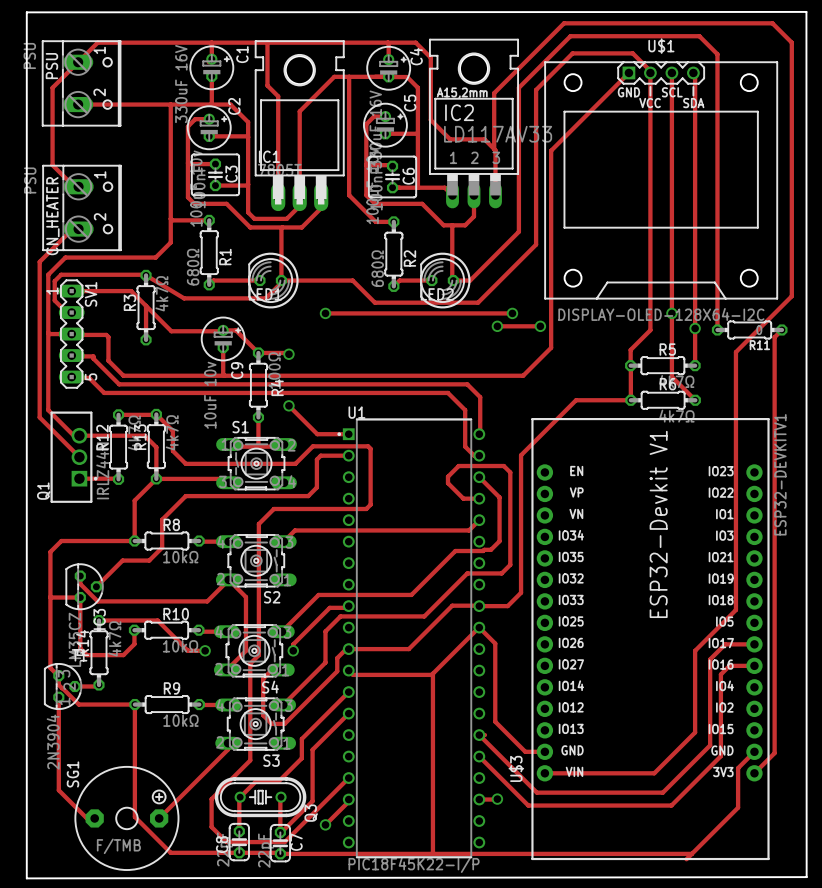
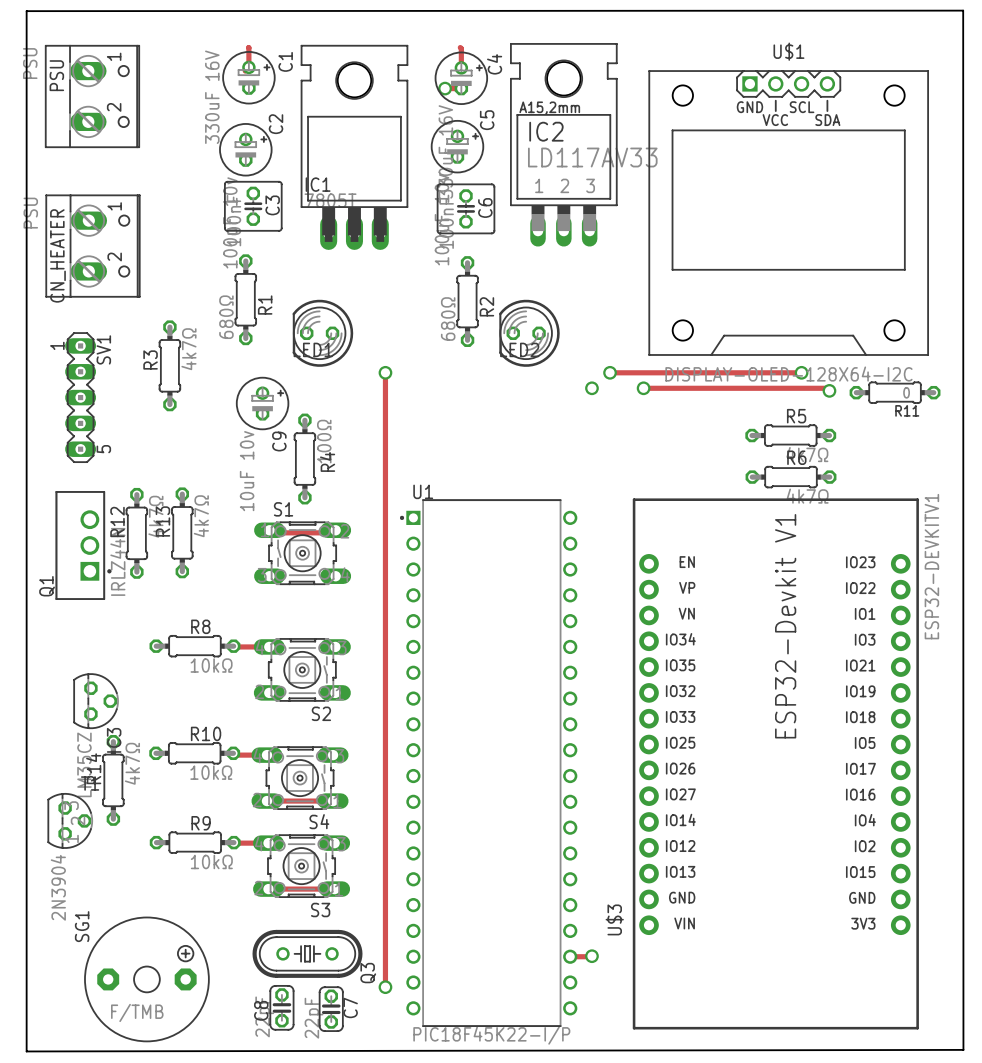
track: (267, 42) (267, 85) (278, 96) (278, 196) -> none
track: (628, 72) (551, 150) (551, 347) (523, 375) (123, 375) (108, 360) (108, 337) (106, 334) (48, 332) -> none
track: (671, 72) (671, 376) (695, 400) -> none
track: (693, 72) (695, 74) (695, 365) -> none
track: (211, 76) (211, 104) -> none
track: (349, 76) (349, 195) (375, 221) (393, 221) -> none
track: (375, 76) (334, 76) (299, 111) (299, 205) (286, 218) (254, 218) (248, 212) (248, 122) (230, 104) (78, 104) -> none
via: none -> (445, 88)
track: (388, 76) (407, 77) (417, 87) (417, 187) -> none
track: (170, 104) (170, 242) (155, 257) (65, 257) (48, 274) (48, 410) (73, 435) (144, 435) (156, 447) (156, 478) -> none
track: (385, 116) (374, 116) (366, 124) (366, 195) (374, 203) (422, 203) (443, 225) (465, 225) (473, 216) (473, 195) -> none
track: (209, 119) (195, 119) (187, 126) (187, 197) (194, 203) (226, 203) (250, 227) (301, 227) (321, 208) (321, 196) -> none
track: (417, 132) (385, 133) -> none
track: (209, 136) (248, 137) -> none
track: (494, 149) (494, 93) (564, 23) (772, 23) (791, 42) (791, 296) (735, 352) (735, 609) (695, 650) (695, 732) (654, 773) (544, 773) -> none
track: (187, 163) (215, 164) -> none
track: (366, 165) (392, 166) -> none
track: (80, 184) (74, 186) (52, 165) (52, 87) (97, 42) (415, 42) (430, 57) (430, 120) (450, 139) (484, 139) (495, 150) (495, 195) -> none
track: (248, 184) (215, 185) -> none
track: (392, 187) (444, 187) (452, 195) -> none
track: (170, 218) (209, 220) -> none
track: (452, 225) (453, 280) (470, 280) (518, 231) (518, 87) (570, 36) (699, 36) (717, 54) (717, 329) -> none
track: (282, 227) (281, 280) -> none
track: (78, 229) (72, 229) (39, 261) (39, 417) (79, 457) -> none
track: (259, 280) (213, 280) (209, 284) -> none
track: (281, 280) (352, 280) (374, 302) (478, 302) (536, 244) (536, 89) (572, 53) (632, 53) (650, 71) (650, 330) (630, 349) (630, 400) (576, 400) (521, 455) (521, 592) (507, 606) (479, 606) -> none
track: (281, 280) (282, 281) (265, 298) (184, 298) (145, 274) (61, 274) (54, 281) (54, 300) (66, 312) (72, 313) -> none
track: (431, 280) (399, 280) (393, 286) -> none
track: (71, 291) (131, 291) (171, 331) (235, 330) (258, 352) (288, 354) -> none
track: (146, 305) (146, 339) -> none
track: (325, 313) (512, 313) -> (801, 372) (610, 372)
track: (497, 326) (540, 326) -> (826, 388) (643, 388)
track: (781, 329) (774, 337) (774, 753) (754, 773) -> none
track: (223, 347) (224, 375) -> none
via: (288, 354) -> none
track: (71, 355) (93, 356) (119, 384) (467, 384) (480, 397) (479, 434) -> none
track: (71, 377) (89, 377) (104, 392) (447, 392) (465, 410) (465, 446) (474, 455) (479, 455) -> none
track: (288, 405) (317, 434) (348, 434) -> none
via: (288, 405) -> none
track: (118, 414) (156, 414) (172, 430) (172, 450) (185, 463) (295, 463) (312, 446) (368, 446) (370, 448) (370, 504) (366, 508) (273, 508) (258, 524) (258, 655) (250, 663) (250, 760) (211, 799) (211, 827) (226, 842) (284, 842) (348, 778) -> none
track: (258, 417) (258, 444) (256, 446) -> none
track: (348, 455) (320, 455) (316, 459) (316, 487) (308, 496) (185, 496) (162, 519) (162, 547) (149, 560) (122, 560) (96, 586) -> none
track: (479, 477) (499, 497) (499, 541) (490, 549) (455, 551) (411, 594) (318, 594) (281, 631) -> none
track: (79, 478) (118, 479) -> none
track: (156, 478) (134, 500) (134, 541) (61, 541) (50, 551) (50, 668) (58, 675) (58, 684) (78, 704) (134, 704) (134, 816) (170, 852) (691, 853) -> none
track: (156, 478) (225, 478) (229, 482) -> none
track: (479, 498) (463, 498) (447, 483) (447, 476) (458, 466) (503, 466) (510, 472) (510, 564) (501, 573) (467, 573) (424, 616) (340, 616) (325, 631) -> (385, 372) (385, 754)
track: (479, 520) (468, 530) (294, 530) (283, 541) -> none
track: (80, 576) (80, 583) (97, 601) (207, 601) (228, 579) (245, 597) (245, 650) (226, 669) -> (321, 801) (266, 801)
track: (50, 597) (80, 597) (80, 648) (86, 655) (123, 655) (134, 644) (134, 630) -> none
track: (348, 606) (347, 607) (329, 607) (293, 644) (293, 650) -> none
track: (482, 606) (452, 605) (408, 649) (346, 649) (337, 658) (337, 671) (284, 723) (271, 723) (263, 715) (263, 678) (271, 669) -> none
track: (98, 620) (157, 620) (187, 650) (205, 650) -> none
track: (754, 644) (725, 644) (710, 659) (710, 745) (662, 792) (536, 792) (479, 735) (484, 735) -> none
via: (205, 650) -> none
via: (293, 650) -> none
track: (325, 662) (283, 704) -> (385, 792) (385, 987)
track: (754, 665) (729, 665) (720, 674) (720, 756) (671, 805) (528, 805) (479, 756) -> none
track: (348, 670) (353, 674) (431, 674) (479, 627) (495, 643) (495, 721) (525, 751) (544, 751) -> none
track: (432, 673) (432, 853) -> none
track: (98, 684) (74, 686) -> none
track: (348, 692) (301, 738) (301, 758) (278, 781) (255, 781) (239, 798) (239, 831) -> none
track: (58, 697) (58, 790) (86, 818) (94, 818) -> none
track: (348, 713) (312, 749) (312, 801) (280, 832) (281, 797) -> none
track: (228, 743) (228, 749) (159, 818) -> (268, 889) (334, 889)
track: (754, 751) (738, 768) (738, 807) (686, 859) -> none
track: (348, 799) (325, 824) -> none

